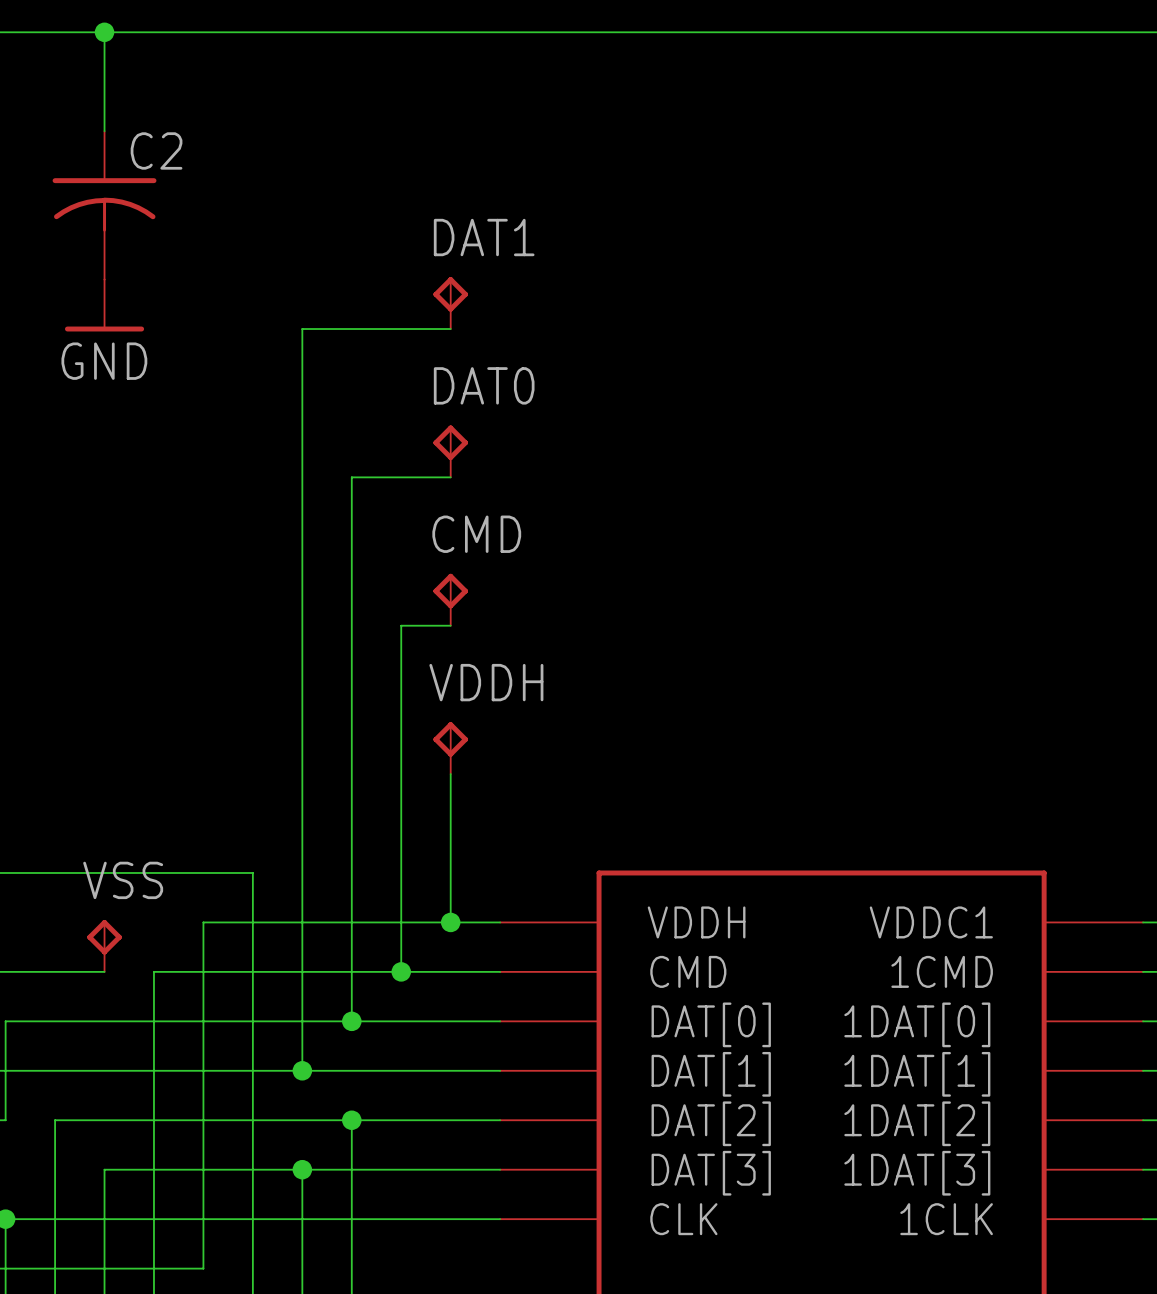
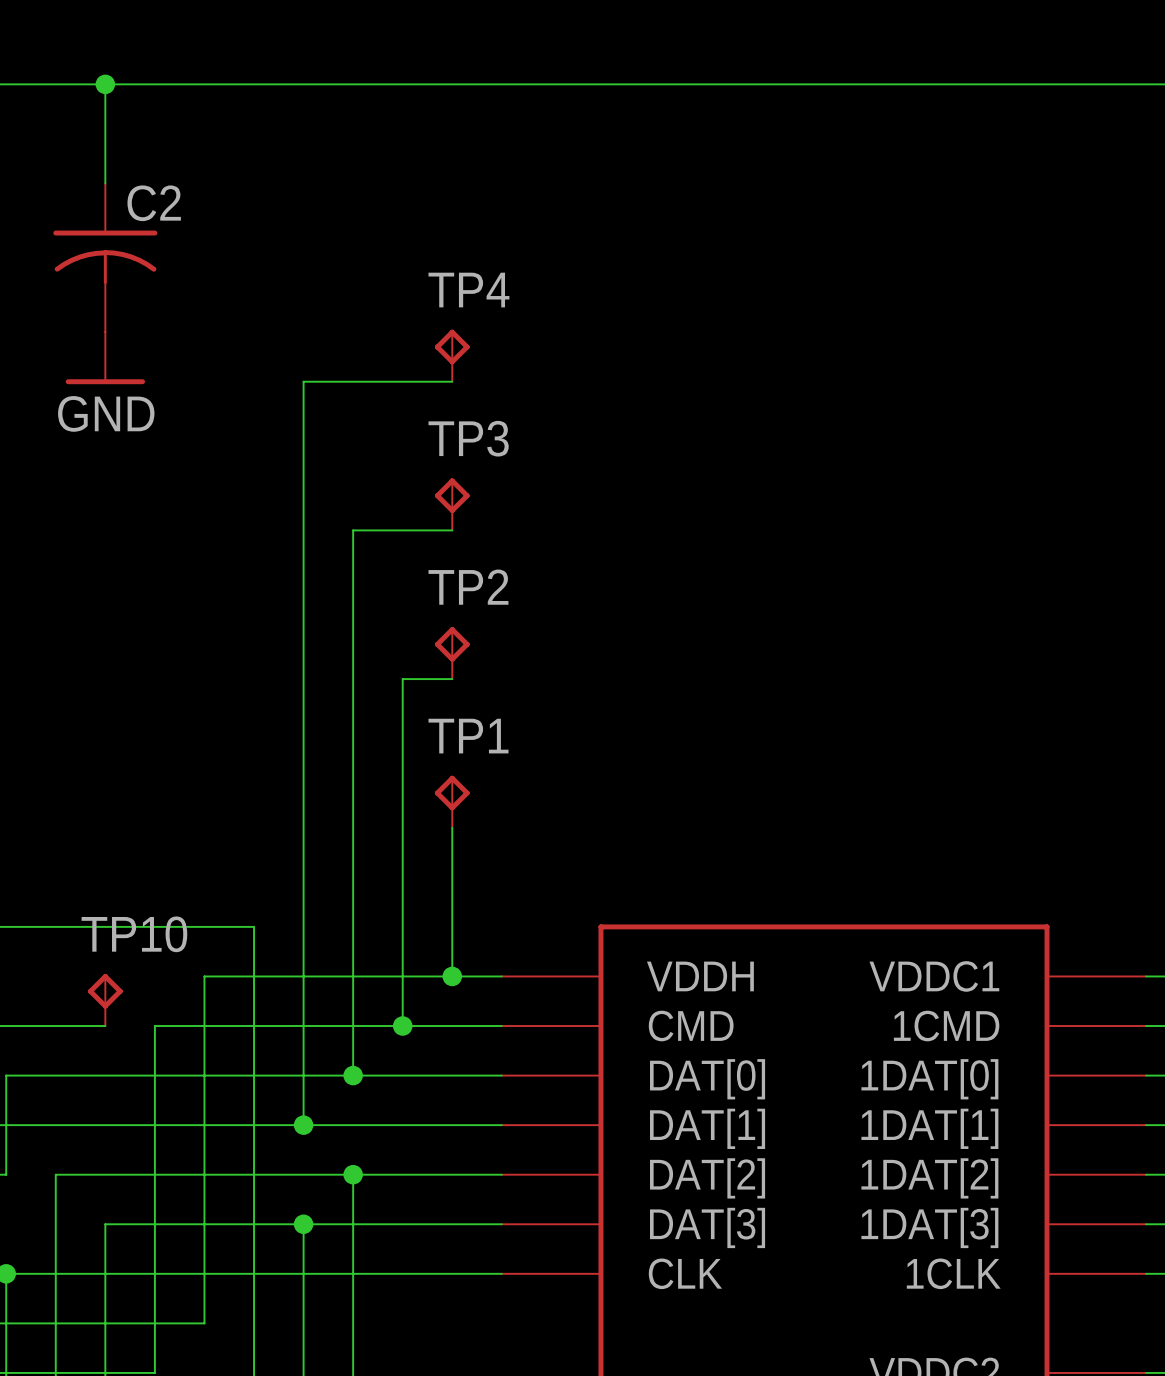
DAT1 name: DAT1 (484, 237) -> TP4 (468, 290)
DAT0 name: DAT0 (484, 385) -> TP3 (468, 438)
CMD name: CMD (476, 534) -> TP2 (468, 587)
VDDH name: VDDH (486, 682) -> TP1 (468, 736)
VSS name: VSS (123, 880) -> TP10 (134, 934)

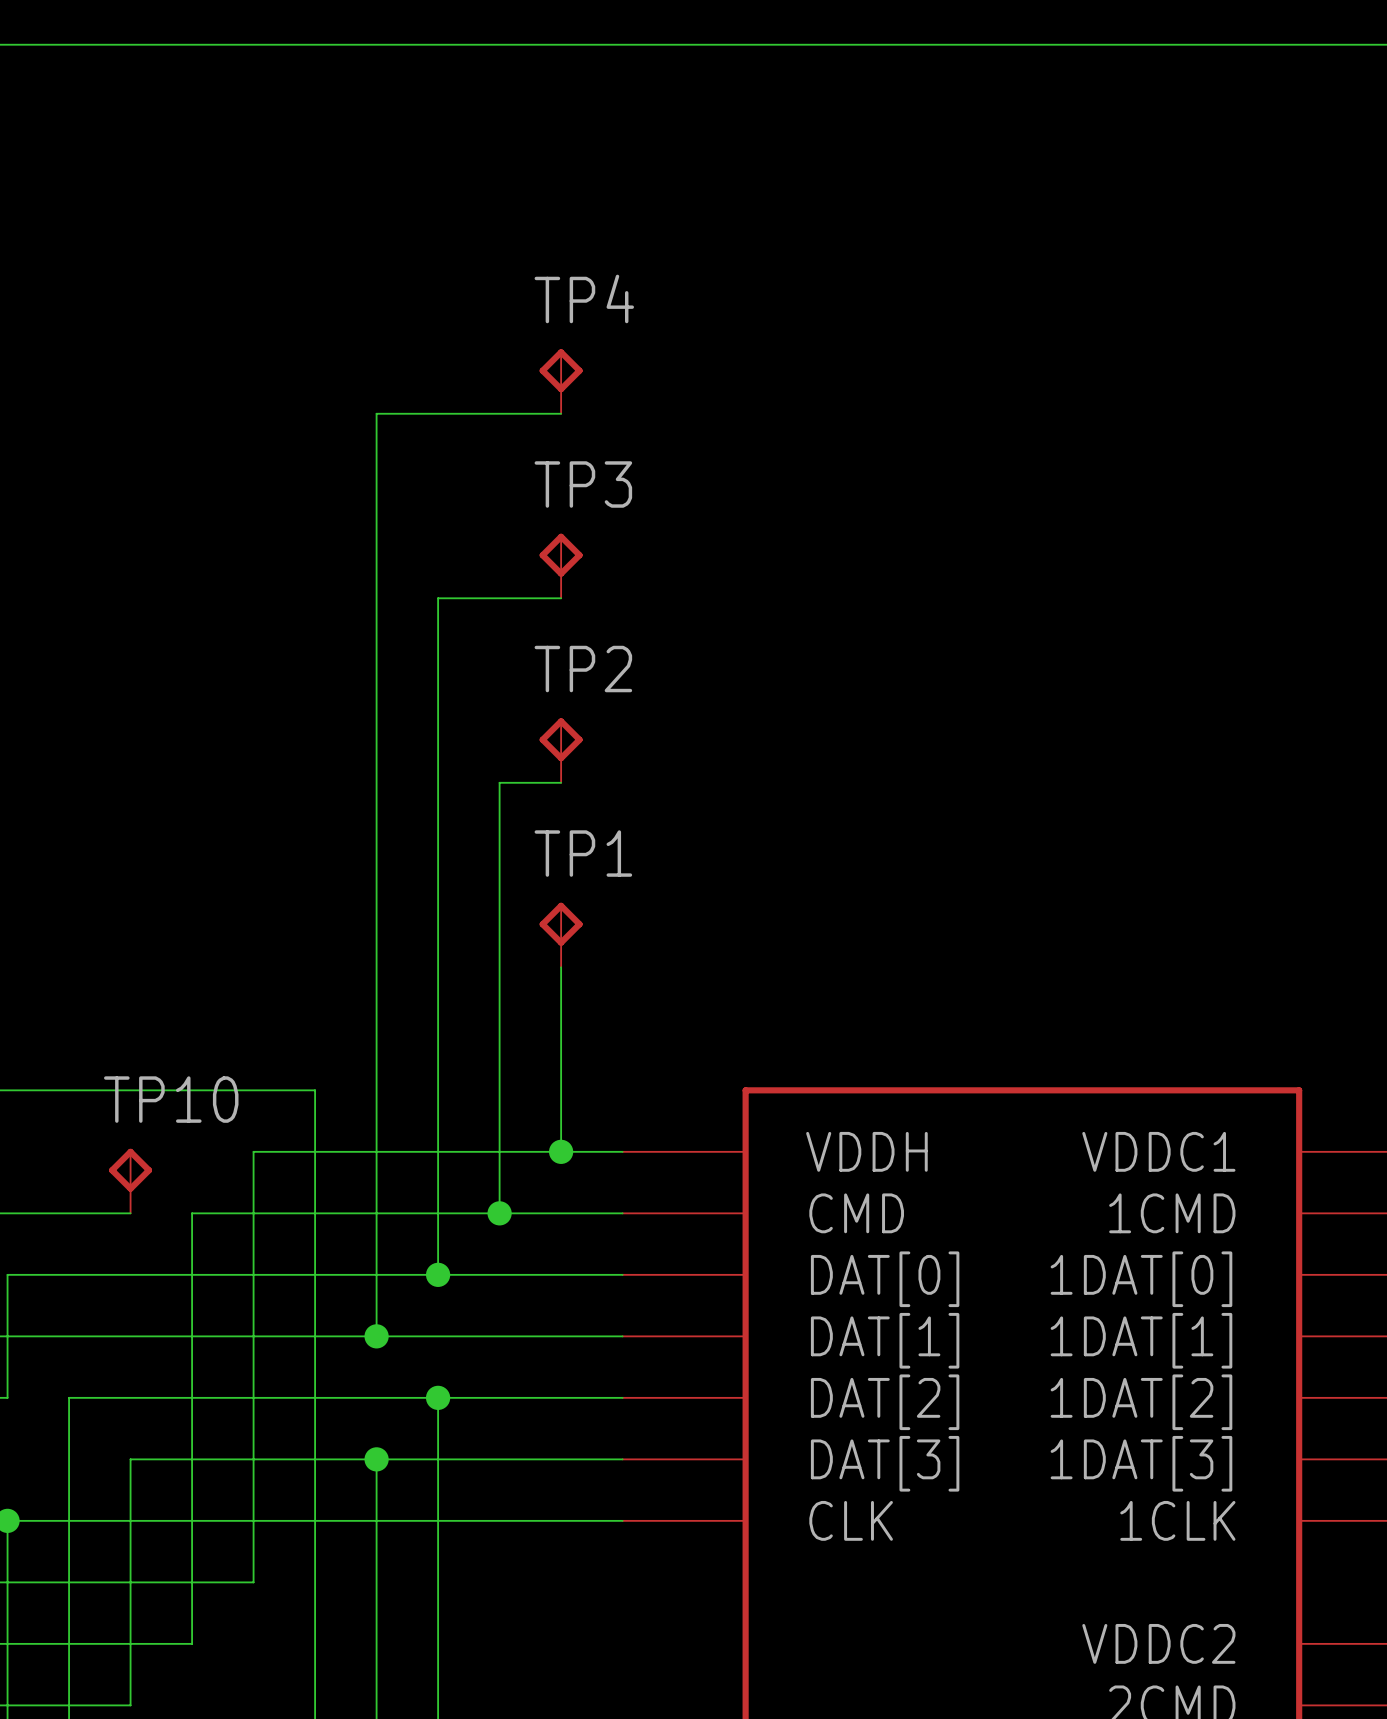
wire: (105, 84) (105, 183) -> none
junction: (105, 84) -> none
C2: (105, 257) -> none
power symbol: GND (105, 358) -> none

